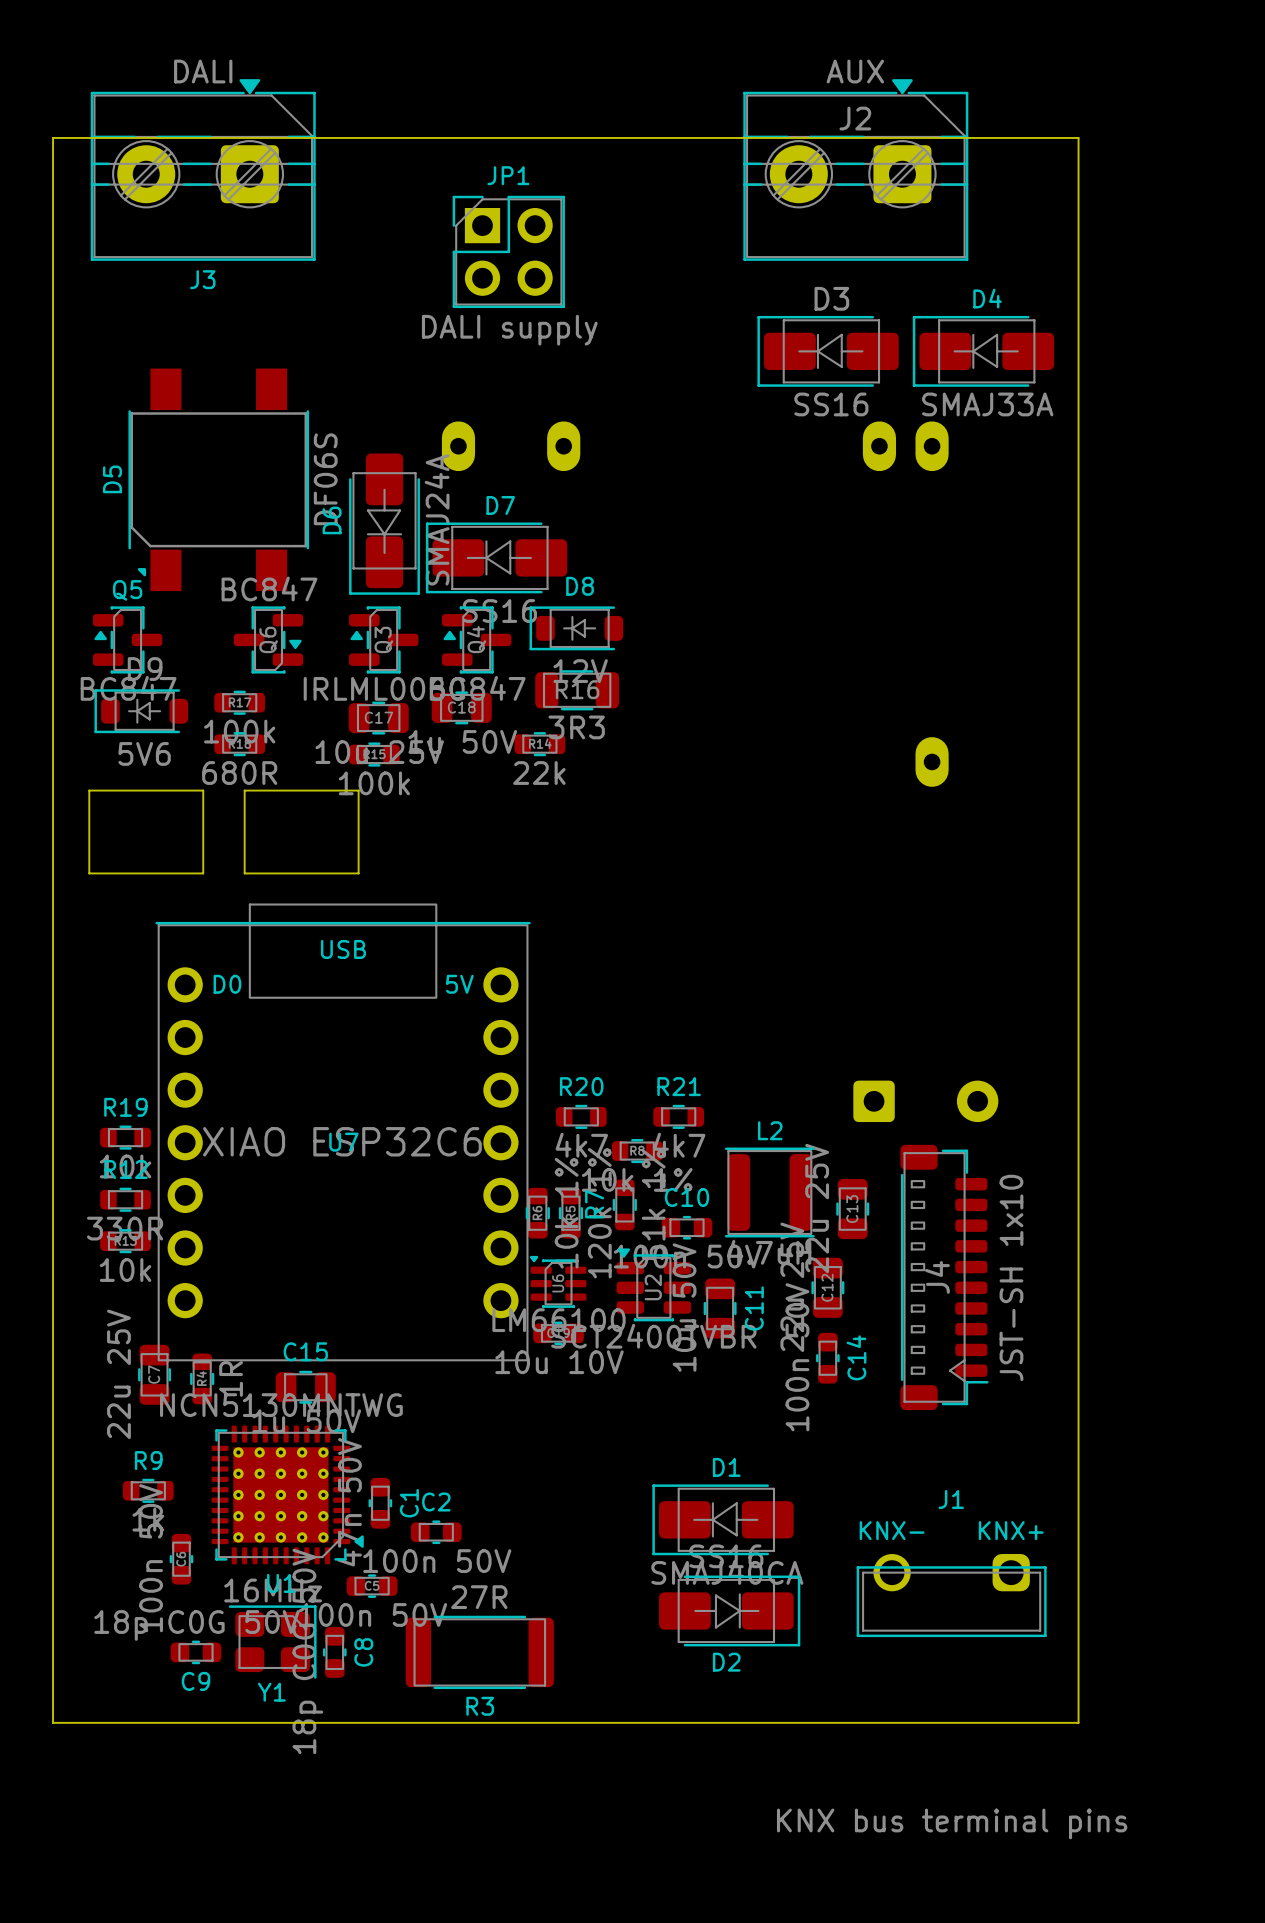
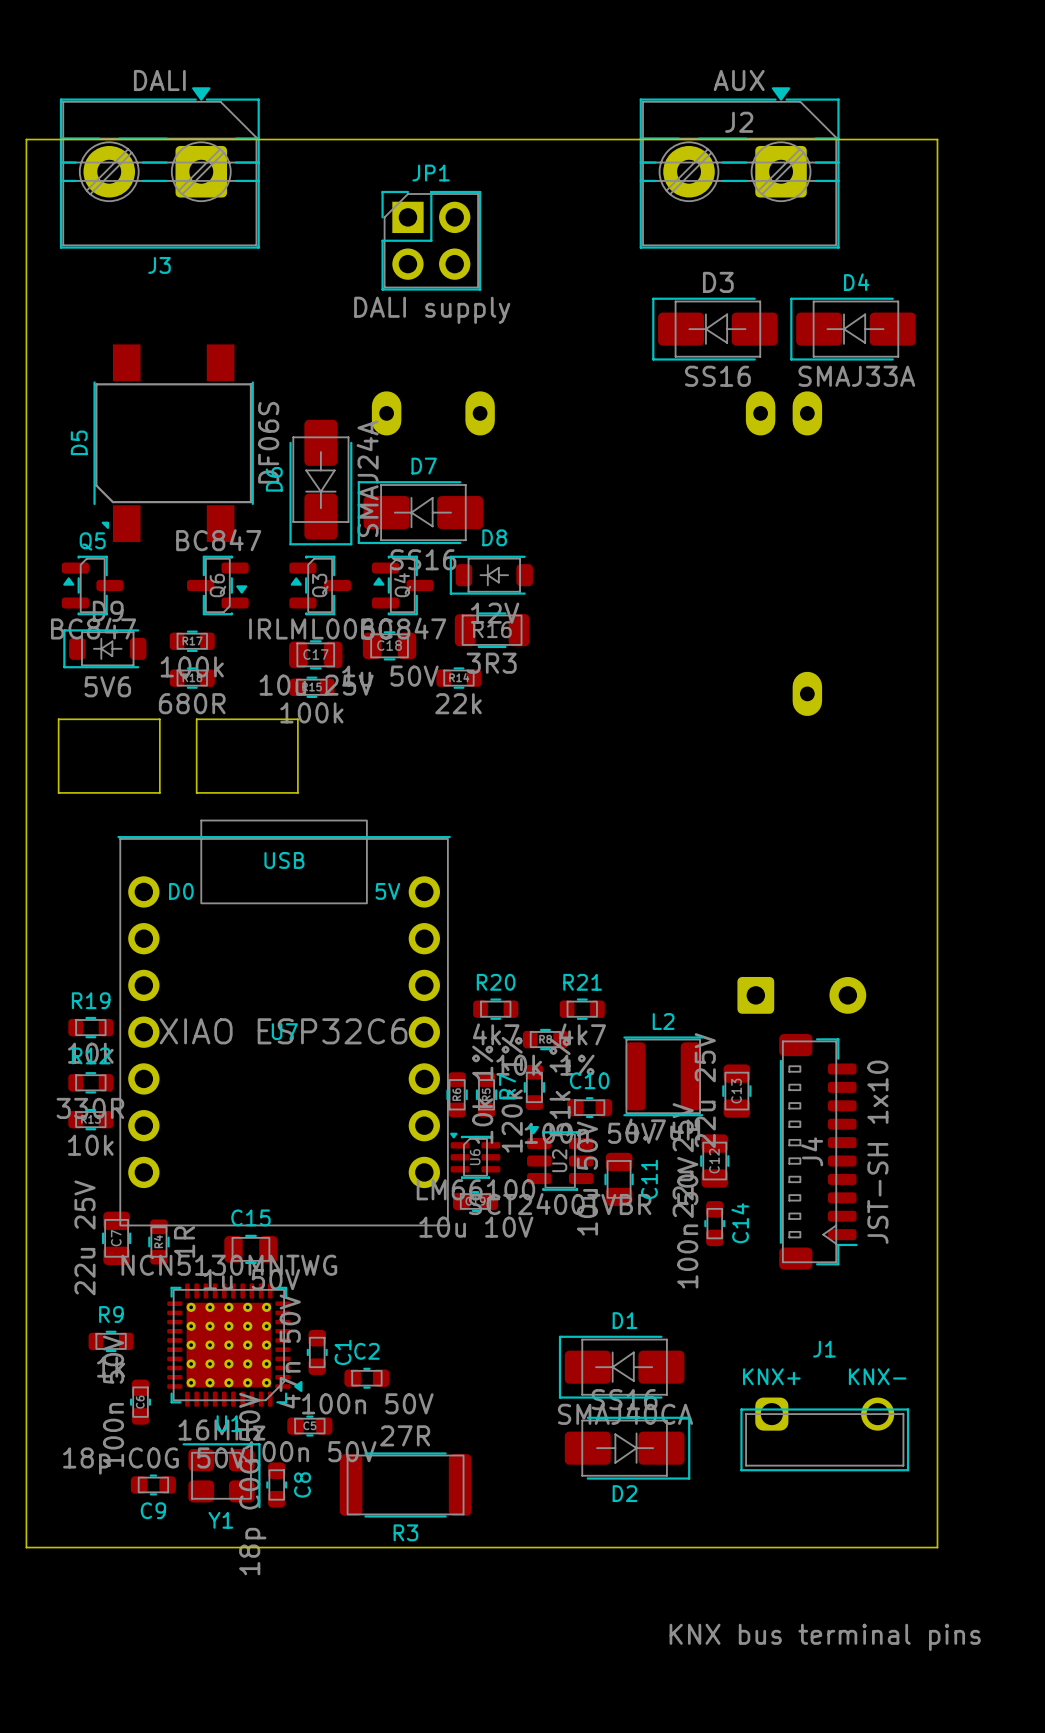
J1 footprint: [856, 1554, 1047, 1638] -> [740, 1397, 910, 1472]

